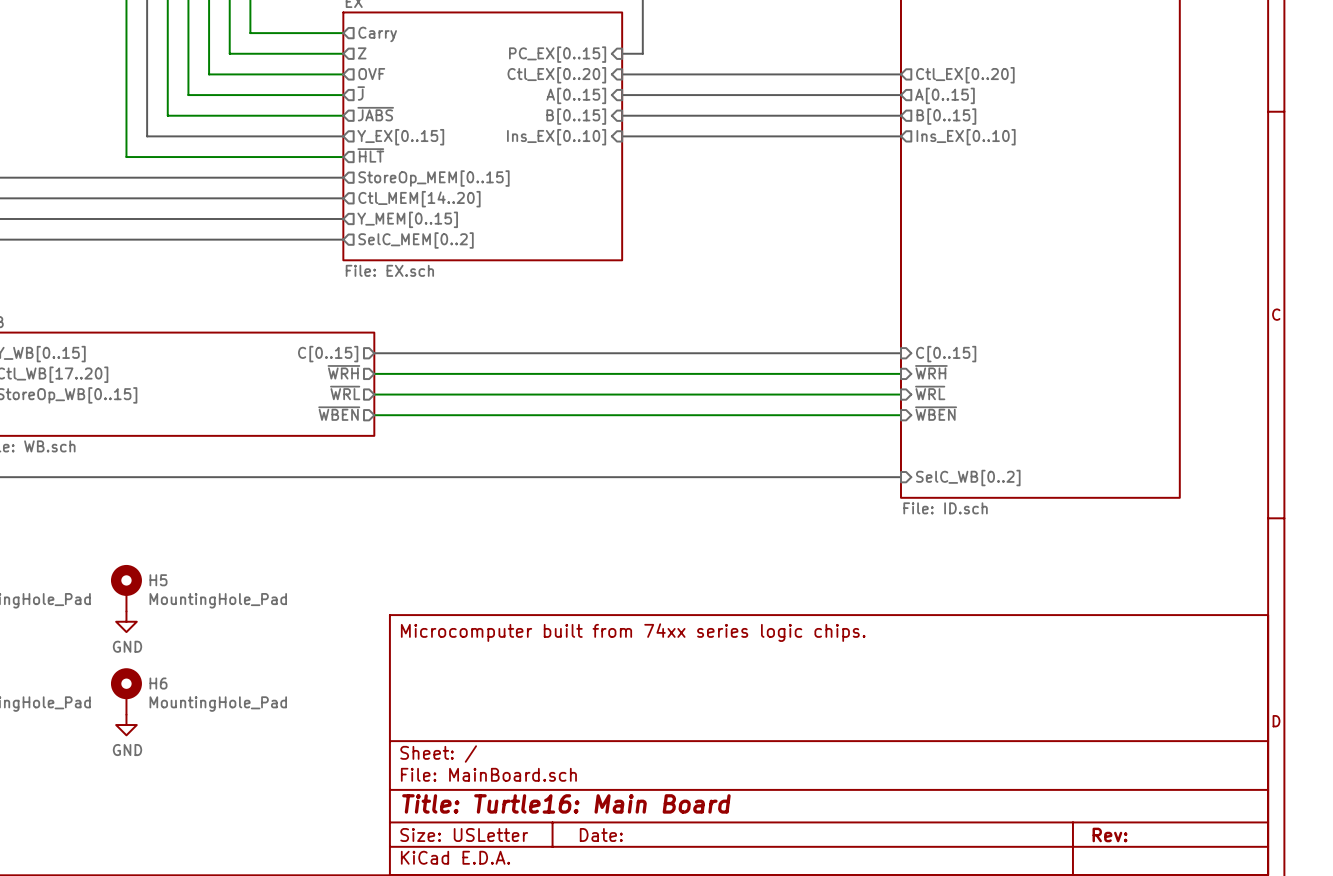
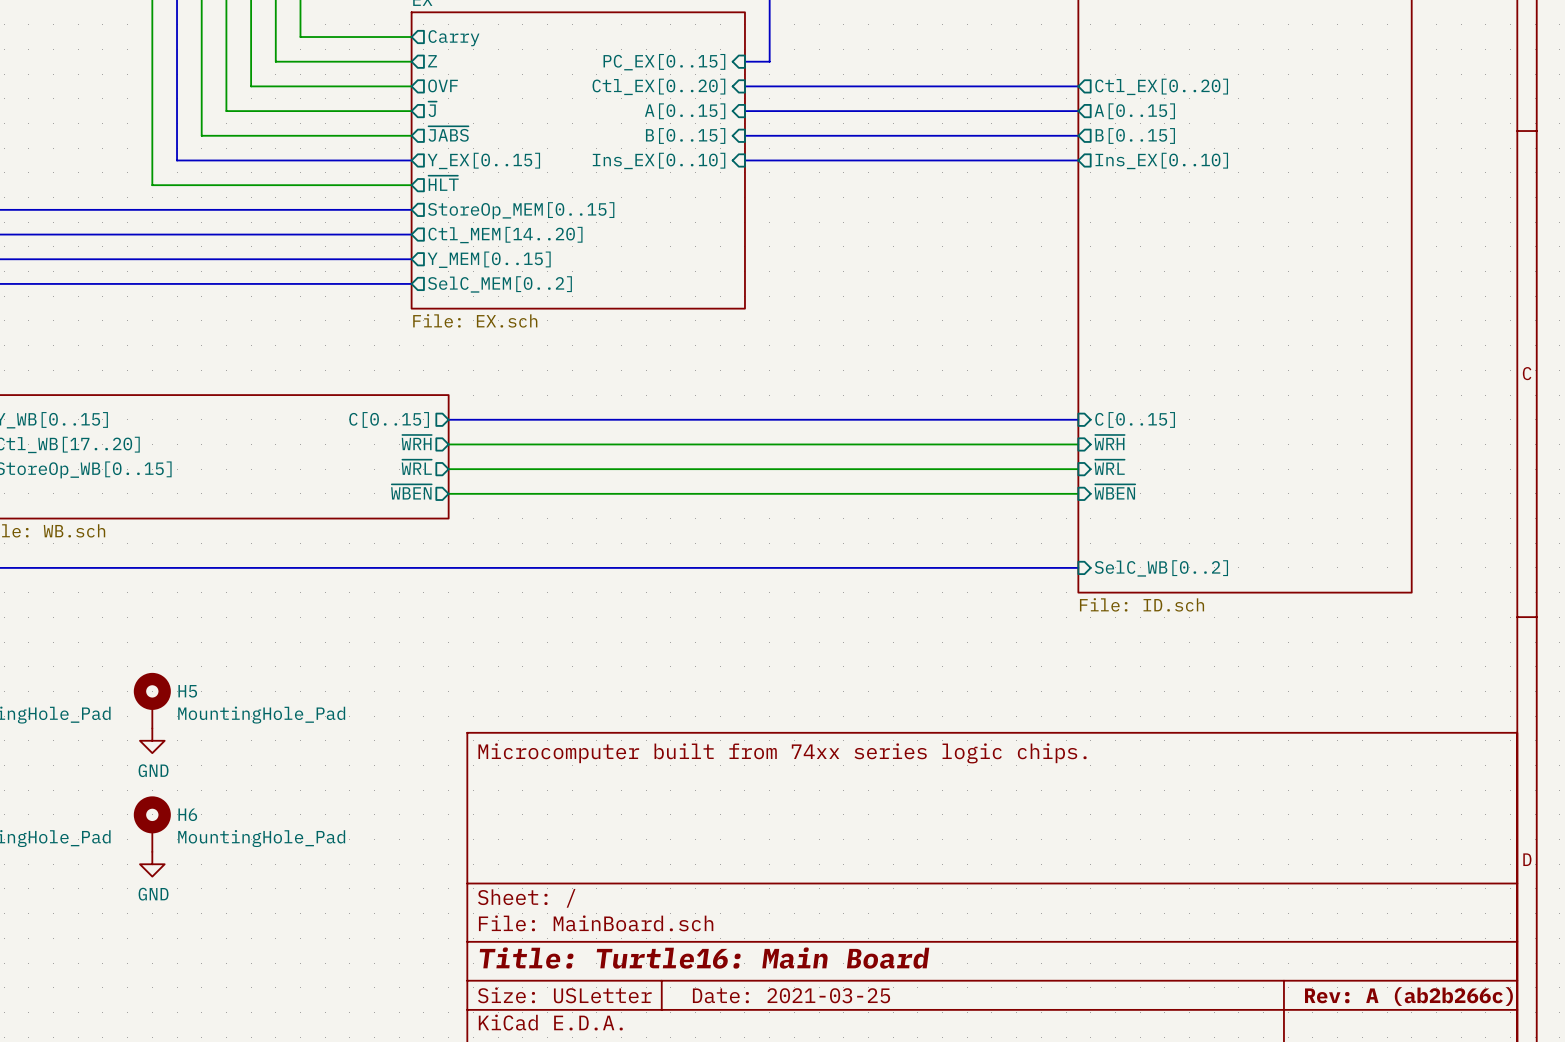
title block: Date: (601, 834) -> Date: 2021-03-25 (791, 995)
title block: Rev: (1110, 834) -> Rev: A (ab2b266c) (1408, 996)

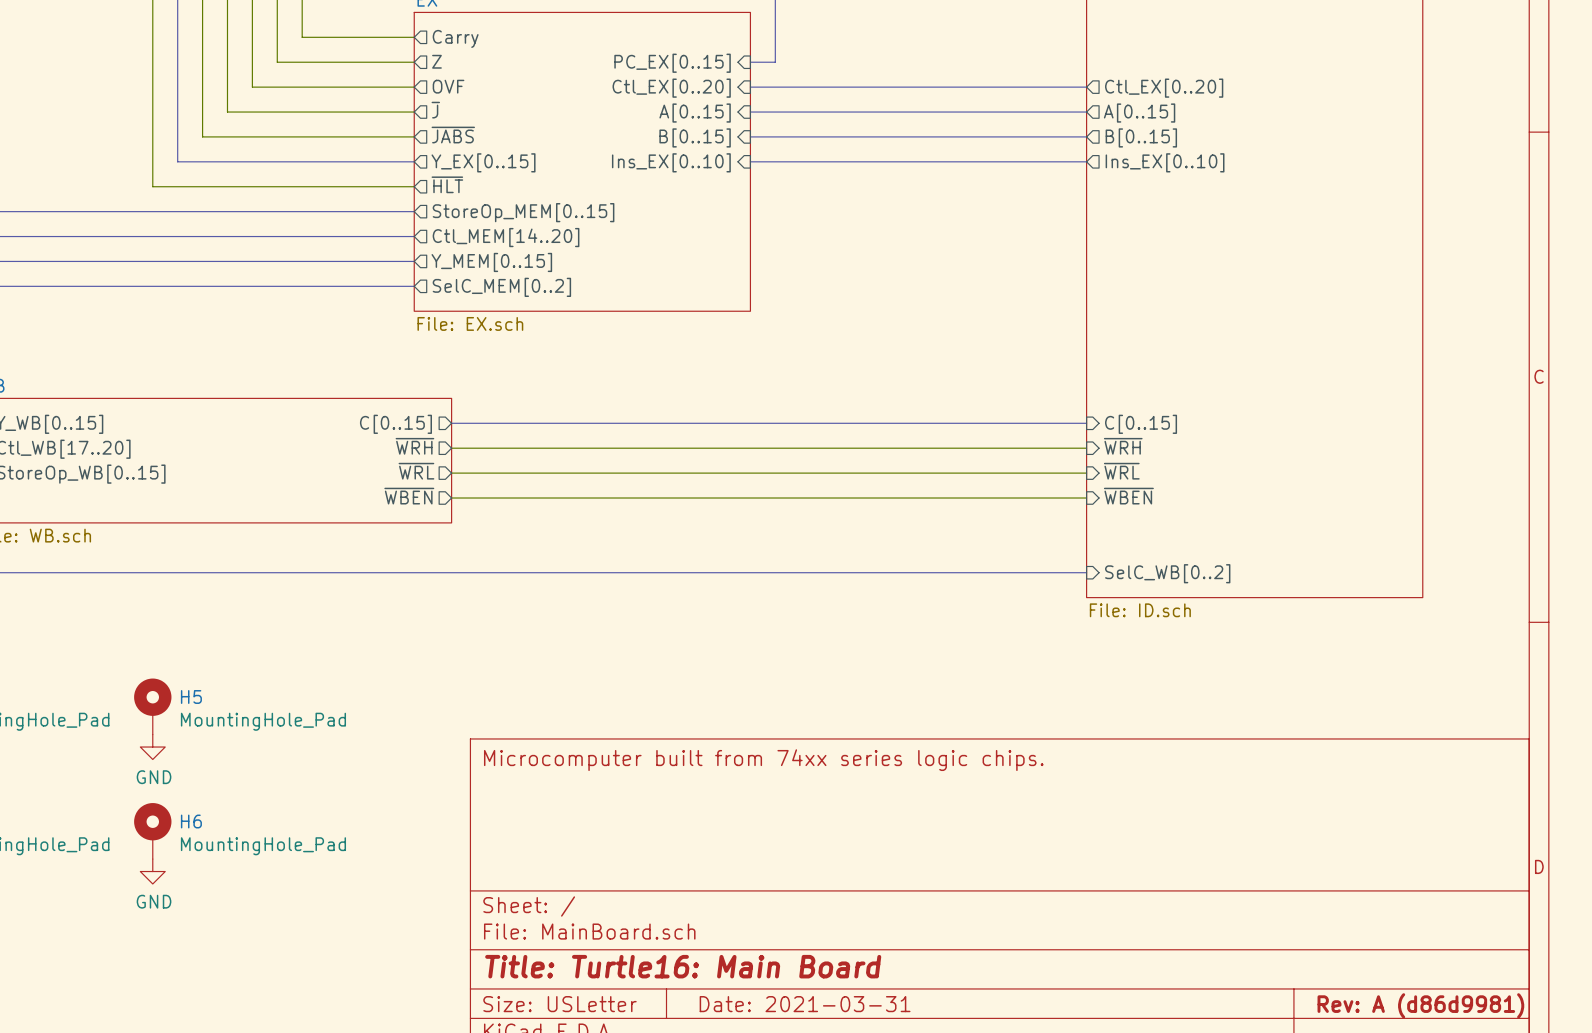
title block: Date: 2021-03-25 (791, 995) -> Date: 2021-03-31 (805, 1004)
title block: Rev: A (ab2b266c) (1408, 996) -> Rev: A (d86d9981) (1420, 1005)

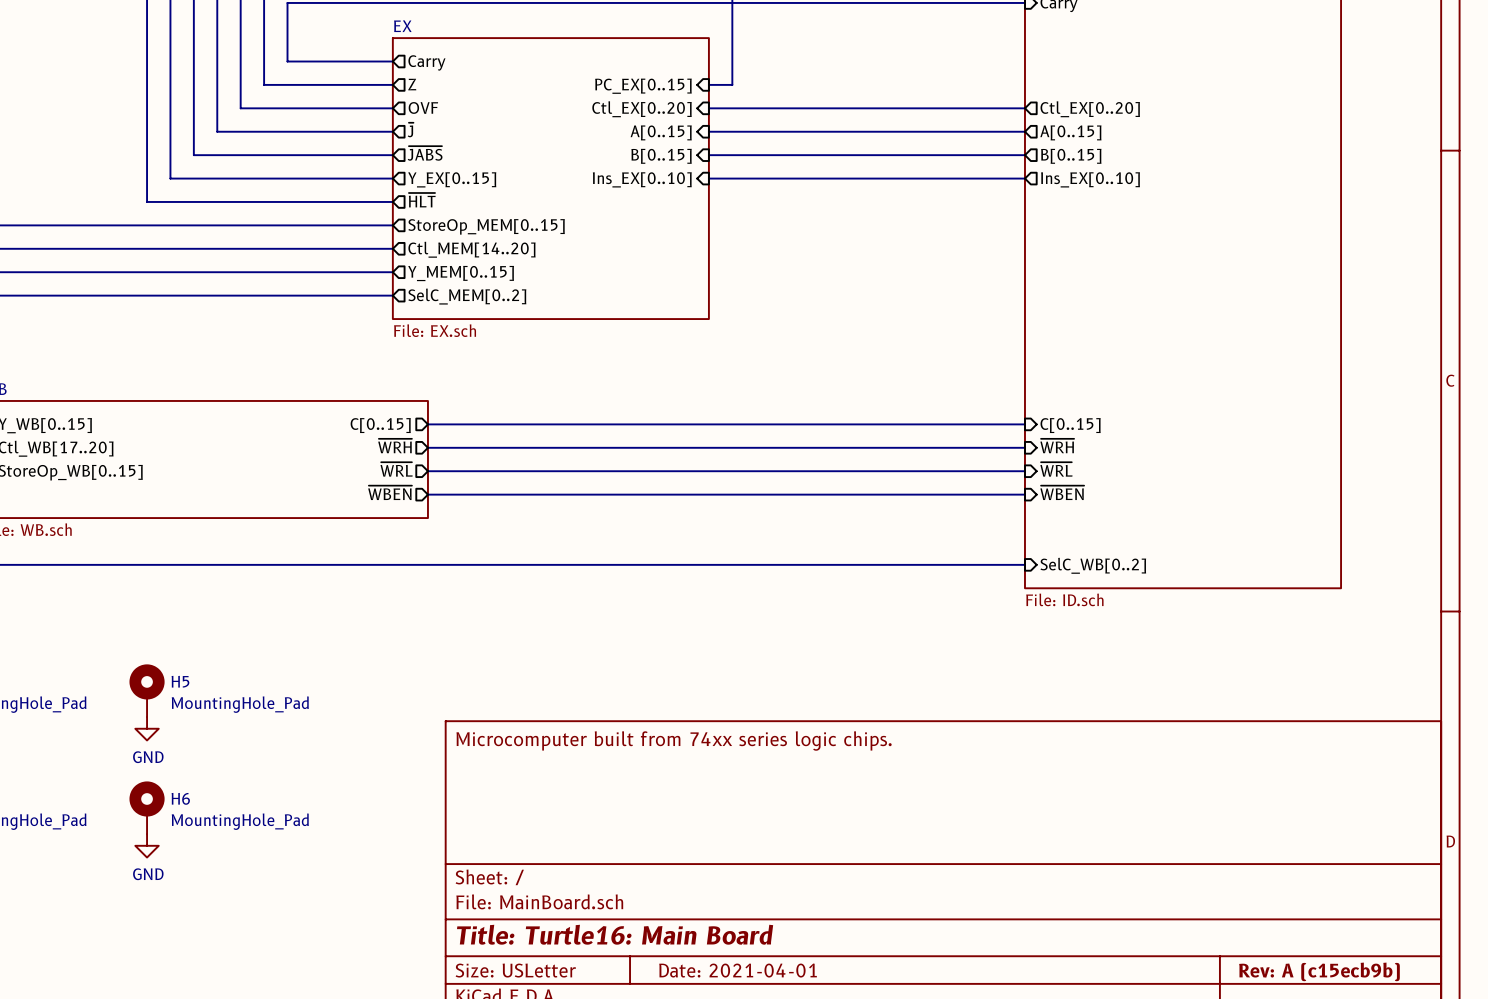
title block: Date: 2021-03-31 (805, 1004) -> Date: 2021-04-01 (738, 970)
title block: Rev: A (d86d9981) (1420, 1005) -> Rev: A (c15ecb9b) (1319, 971)

